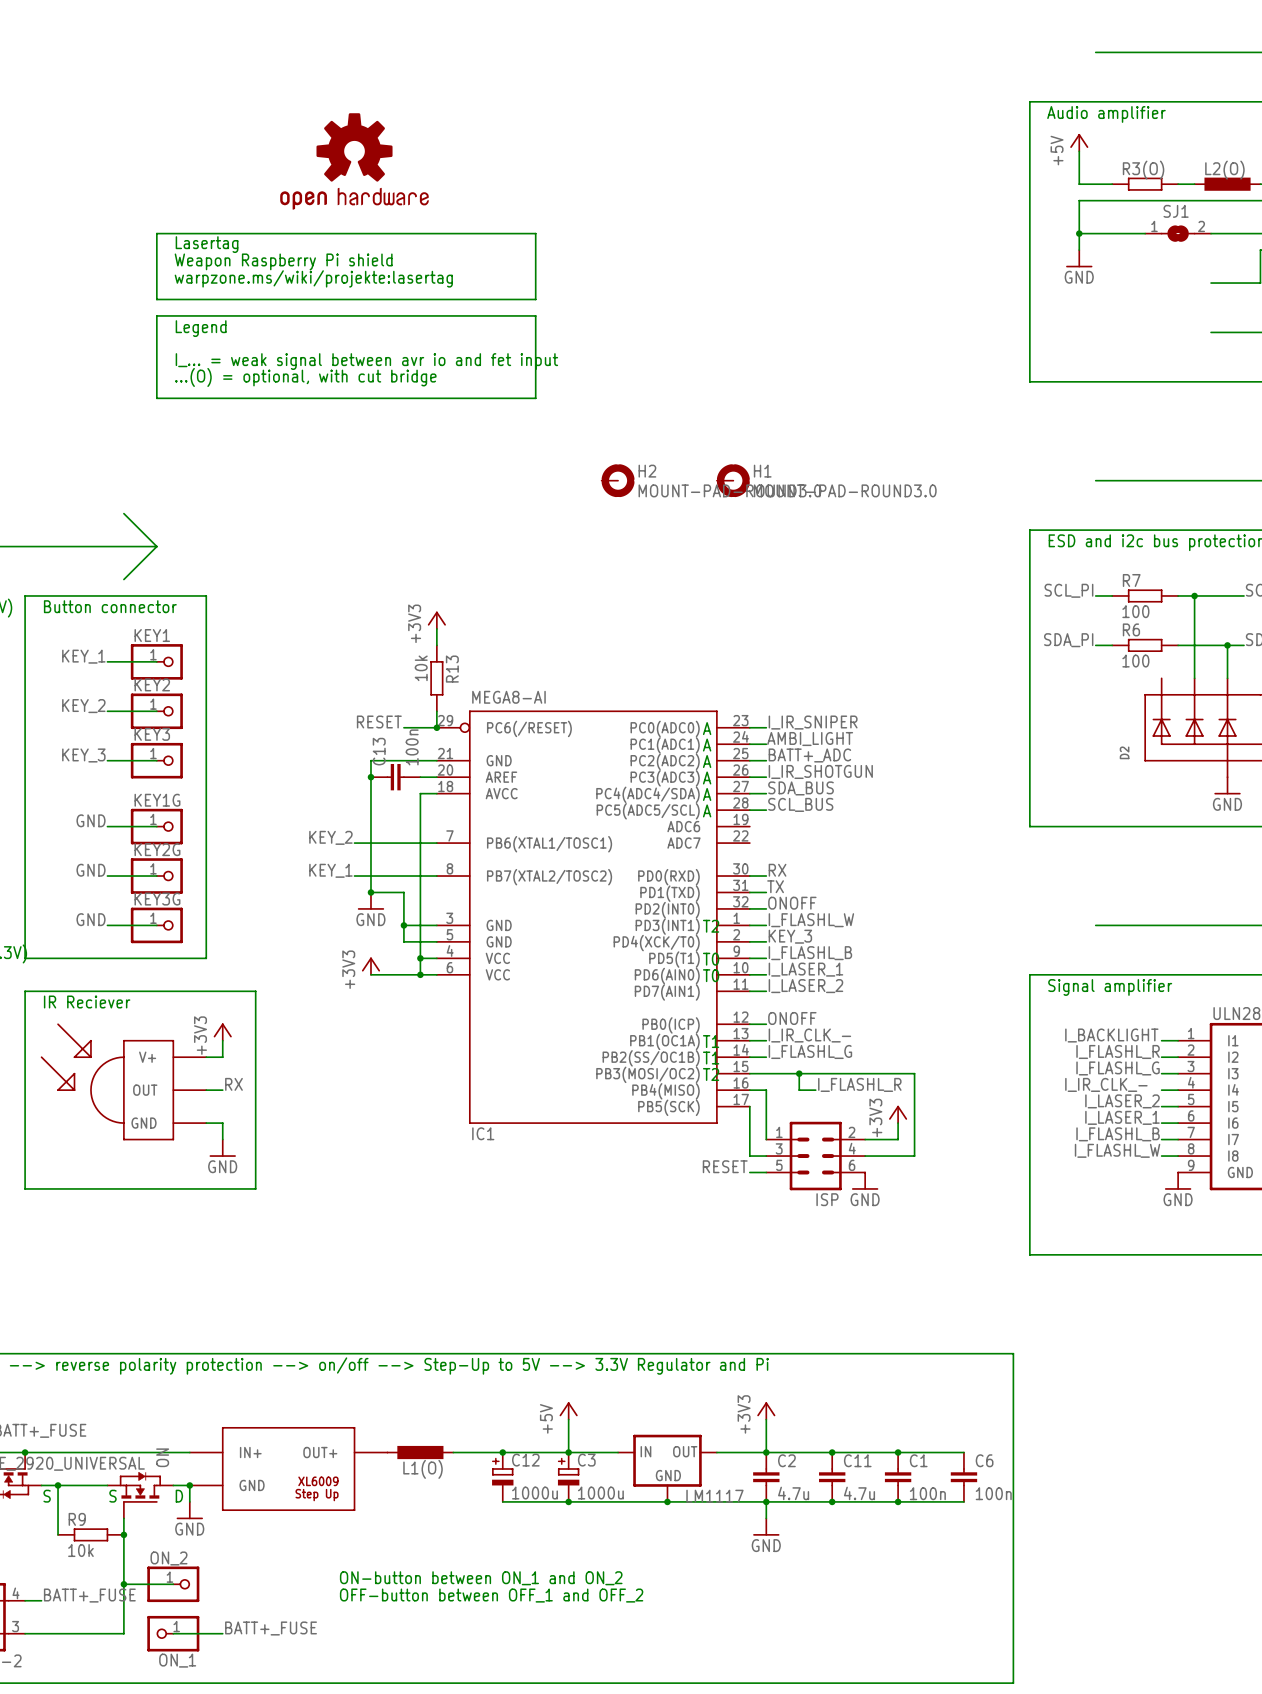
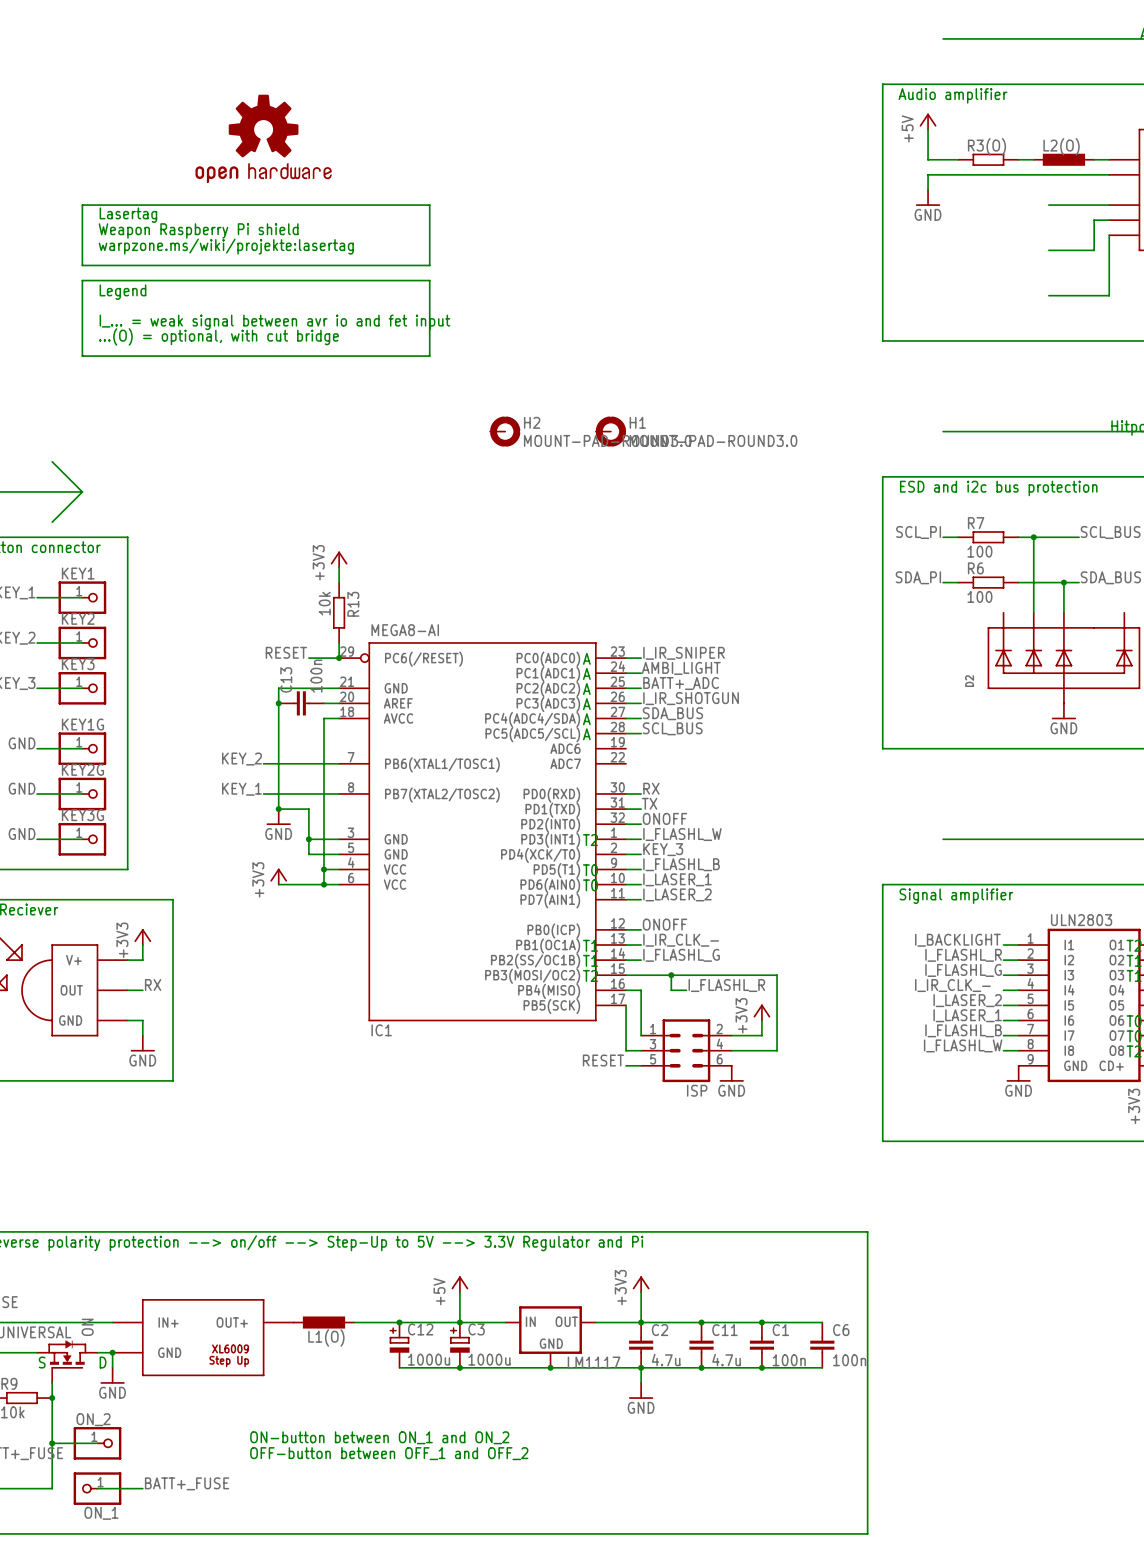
wire: (1079, 233) (1145, 233) -> none
junction: (1079, 233) -> none
SJ1: (1178, 233) -> none
power symbol position: GND (1079, 258) -> GND (928, 197)

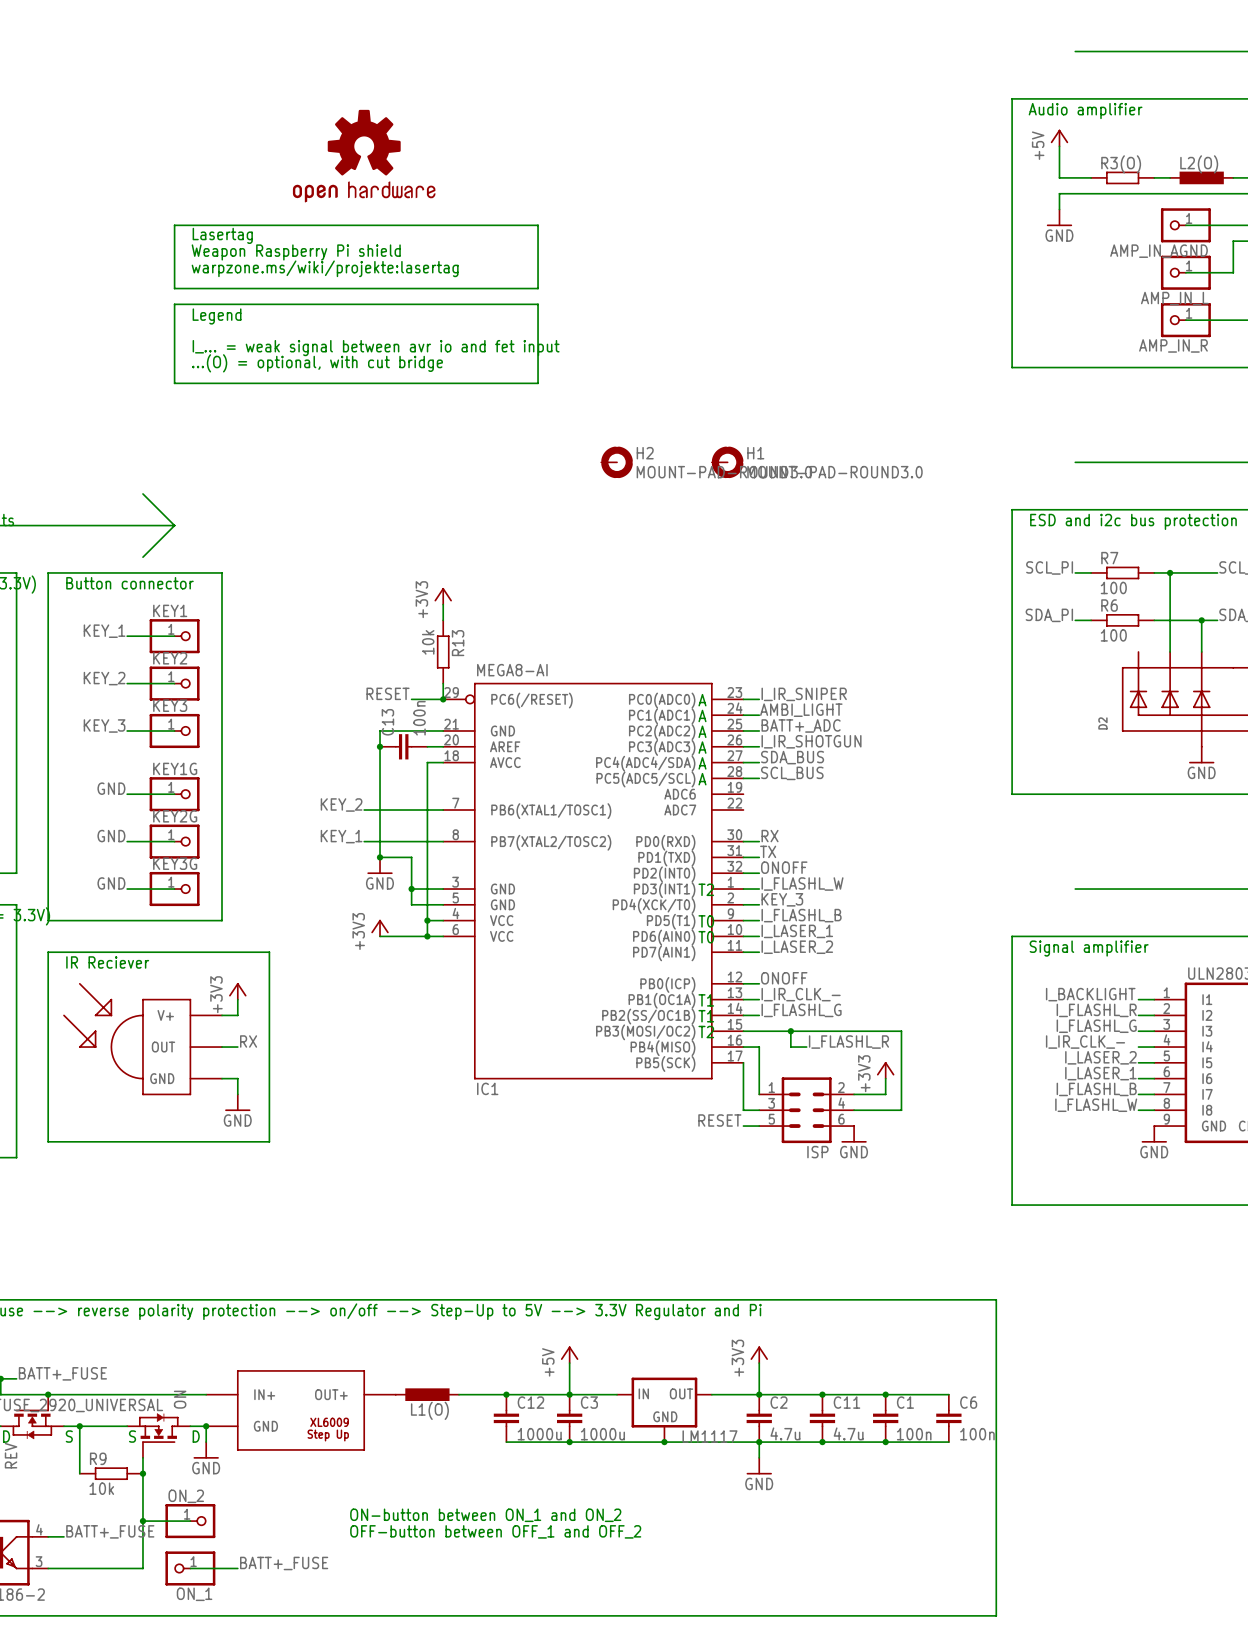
AMP_IN_AGND: none -> (1185, 225)
AMP_IN_L: none -> (1185, 272)
AMP_IN_R: none -> (1185, 320)
C12 symbol: [389, 1322, 410, 1368] -> [493, 1394, 520, 1443]
C3 symbol: [450, 1322, 470, 1368] -> [556, 1394, 583, 1443]

